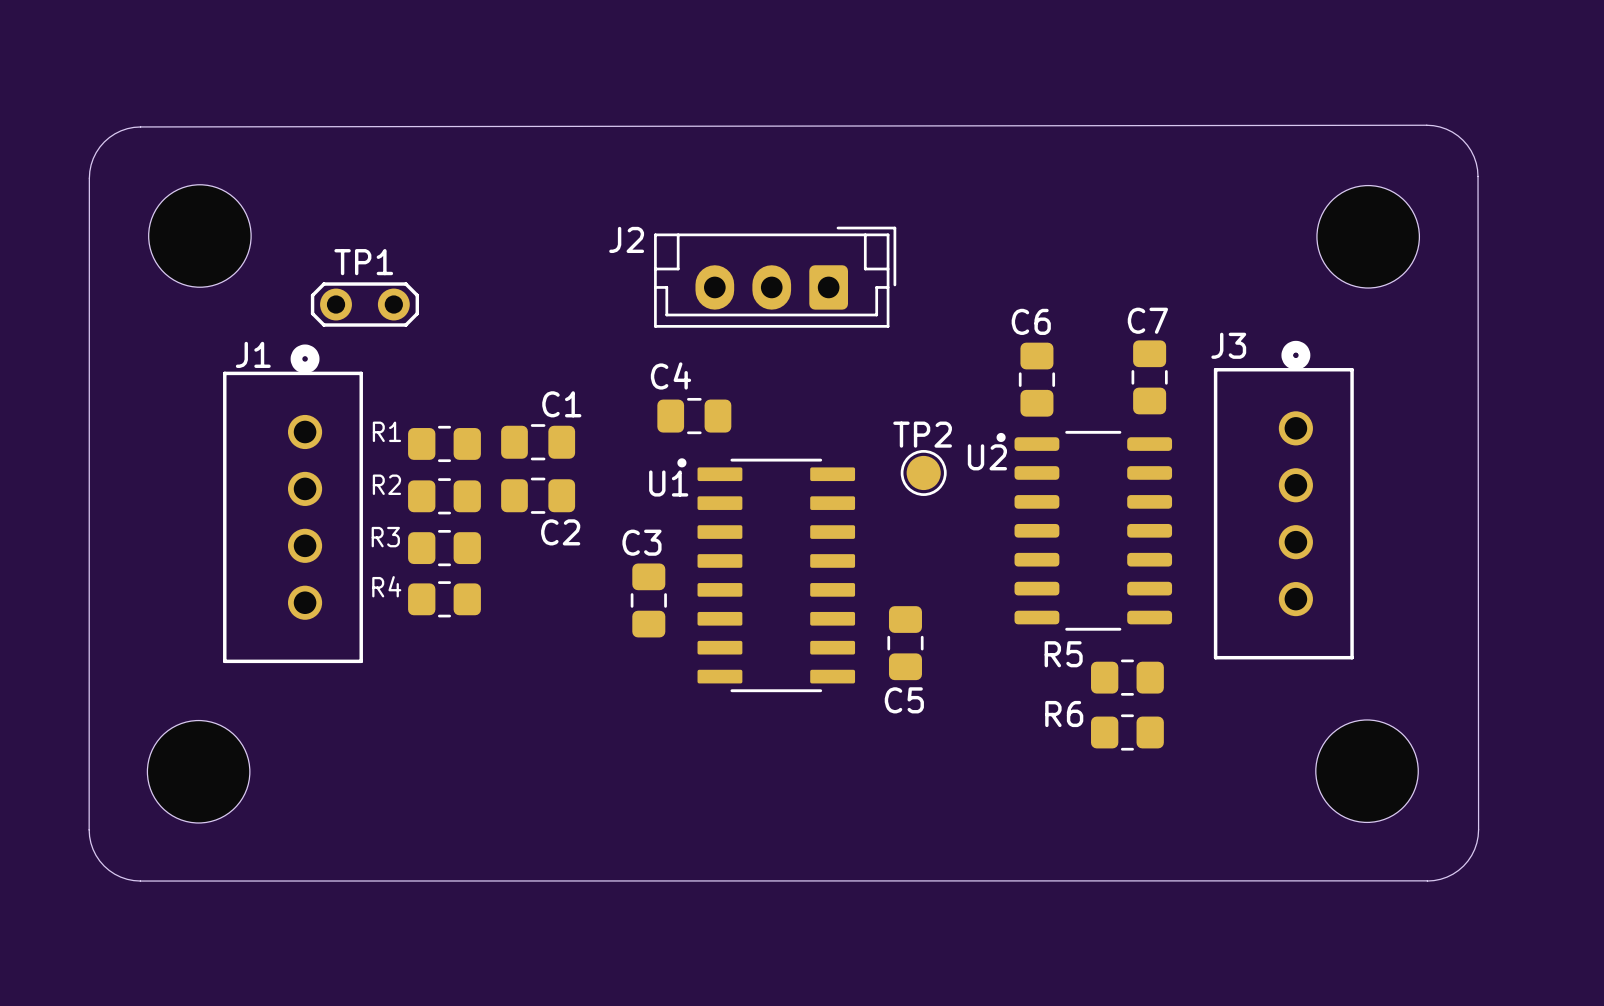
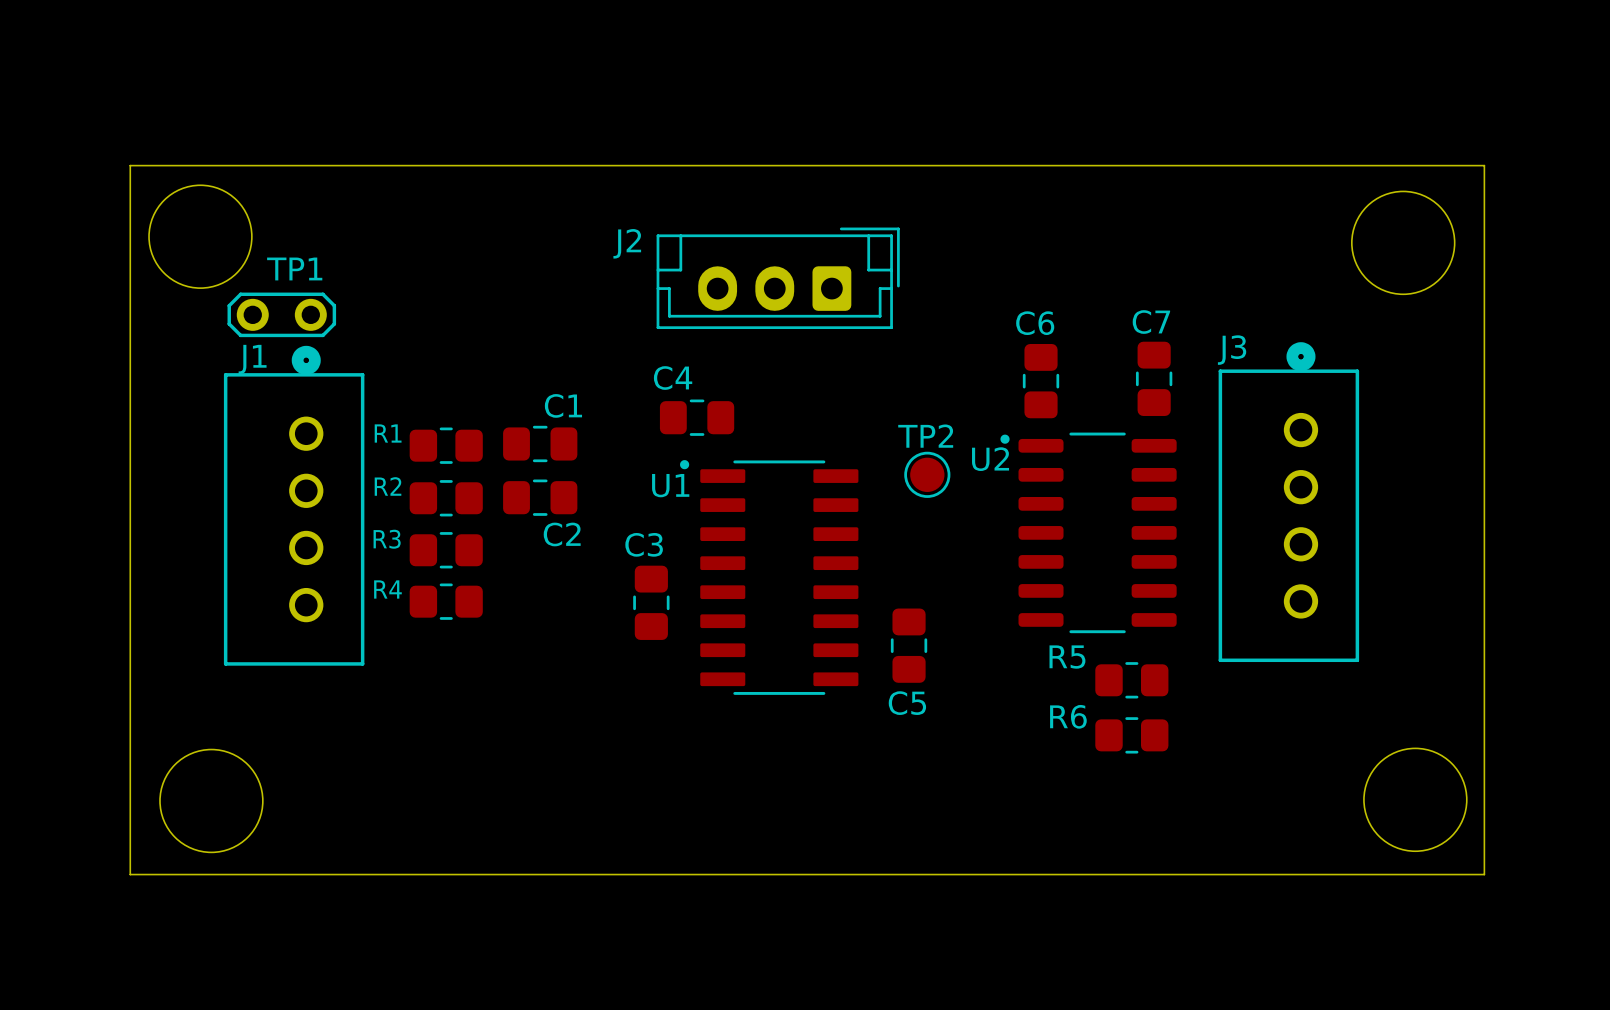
round board edge: none -> [148, 184, 253, 289]
round board edge: none -> [1351, 190, 1456, 295]
part: (199, 235) -> none
part: (1368, 236) -> none
TP1 name position: TP1 (363, 262) -> TP1 (294, 268)
TP1 position: (364, 304) -> (281, 314)
round board edge: none -> [1363, 747, 1468, 852]
round board edge: none -> [159, 748, 264, 853]
part: (198, 771) -> none
part: (1367, 771) -> none
board edge: (1427, 880) (140, 881) (127, 879) (114, 874) (104, 866) (96, 855) (90, 843) (89, 829) (89, 178) (91, 164) (96, 152) (104, 141) (114, 133) (127, 128) (140, 126) (1426, 125) (1440, 126) (1452, 132) (1463, 140) (1471, 150) (1476, 163) (1478, 176) (1478, 829) (1474, 849) (1463, 866) (1446, 877) (1427, 881) -> (130, 165) (130, 874) (1484, 874) (1484, 165) (130, 165)

